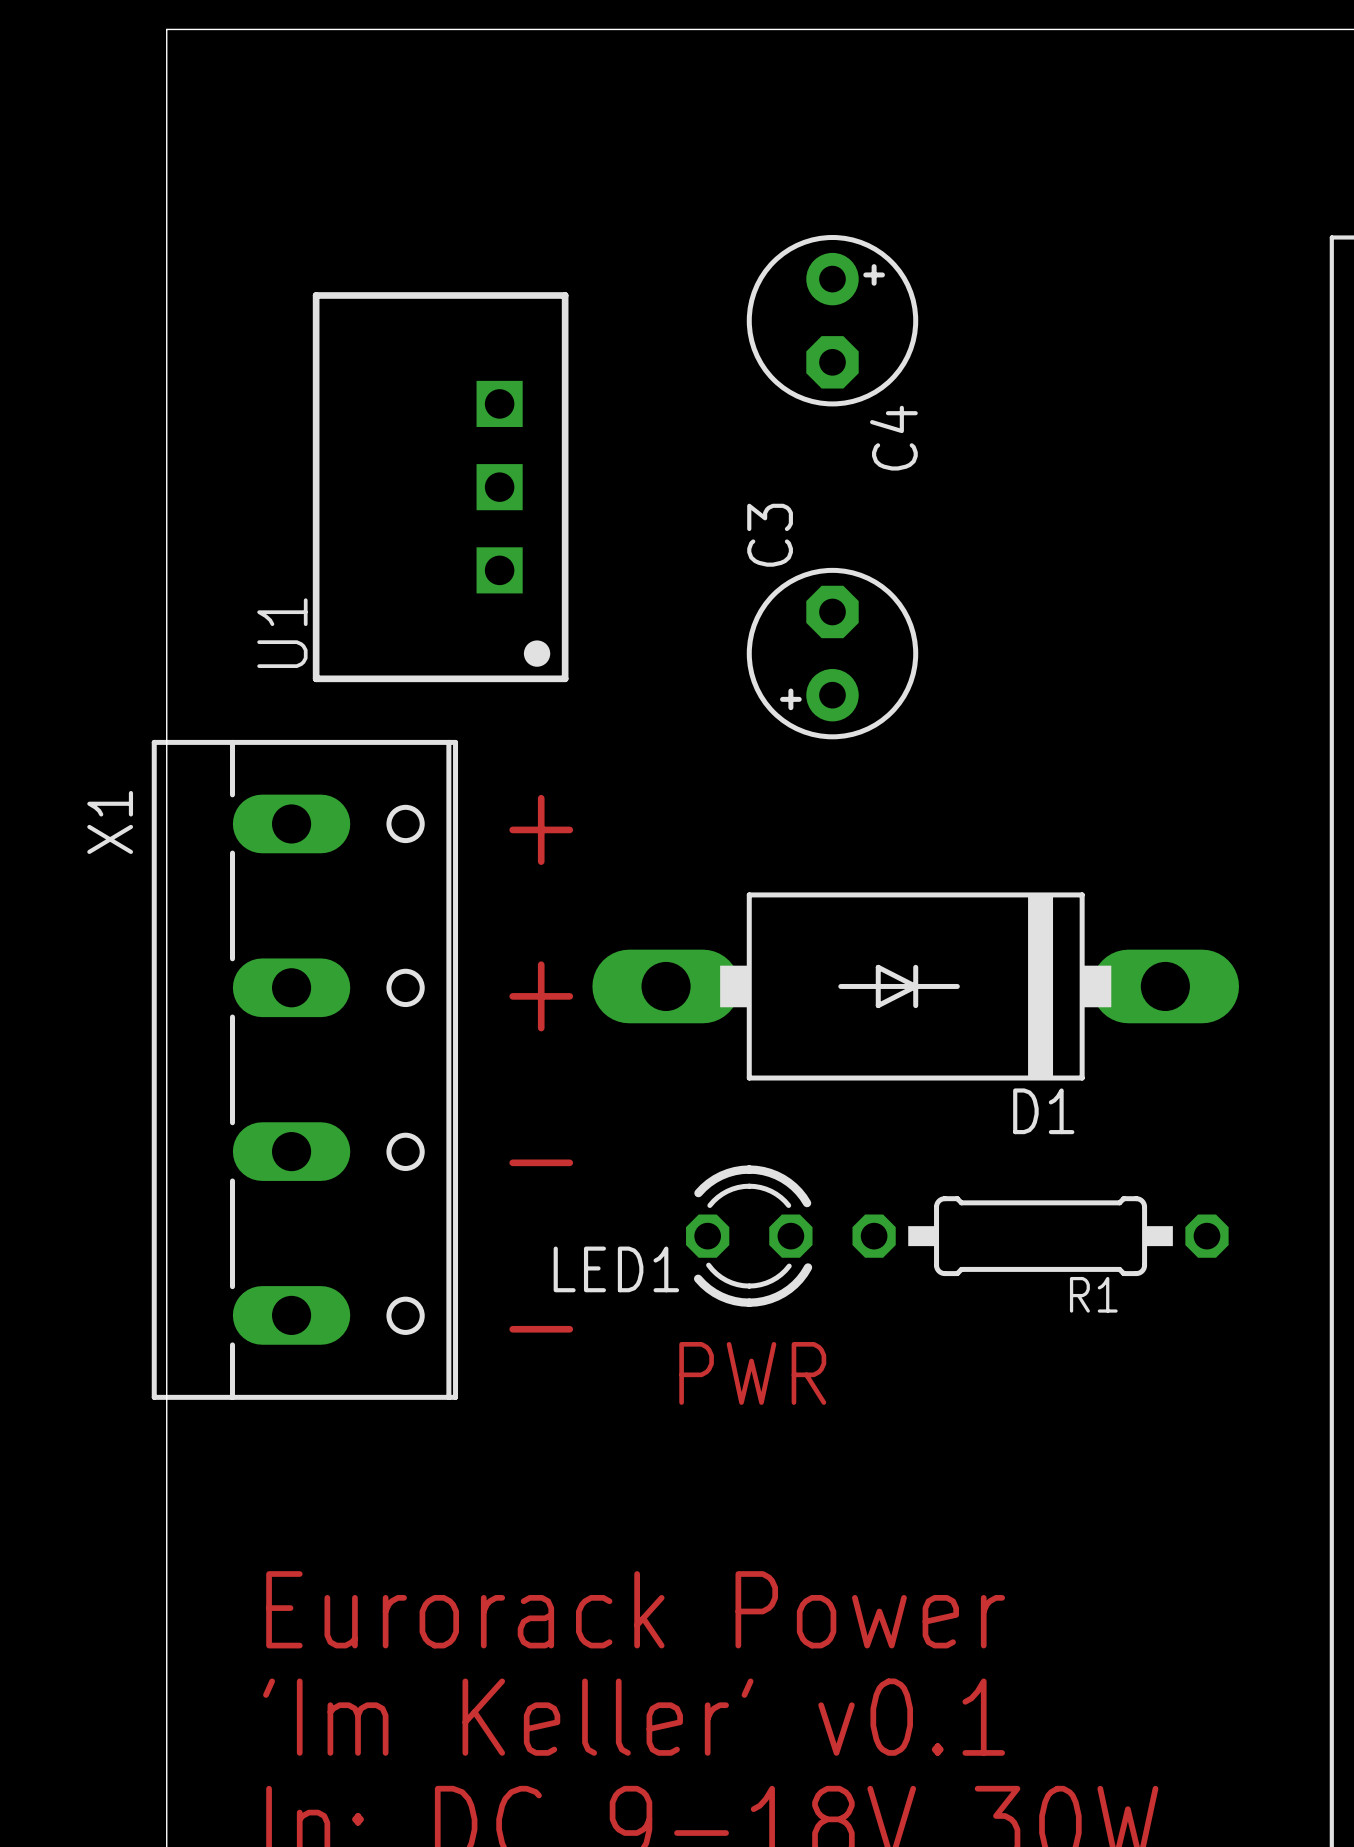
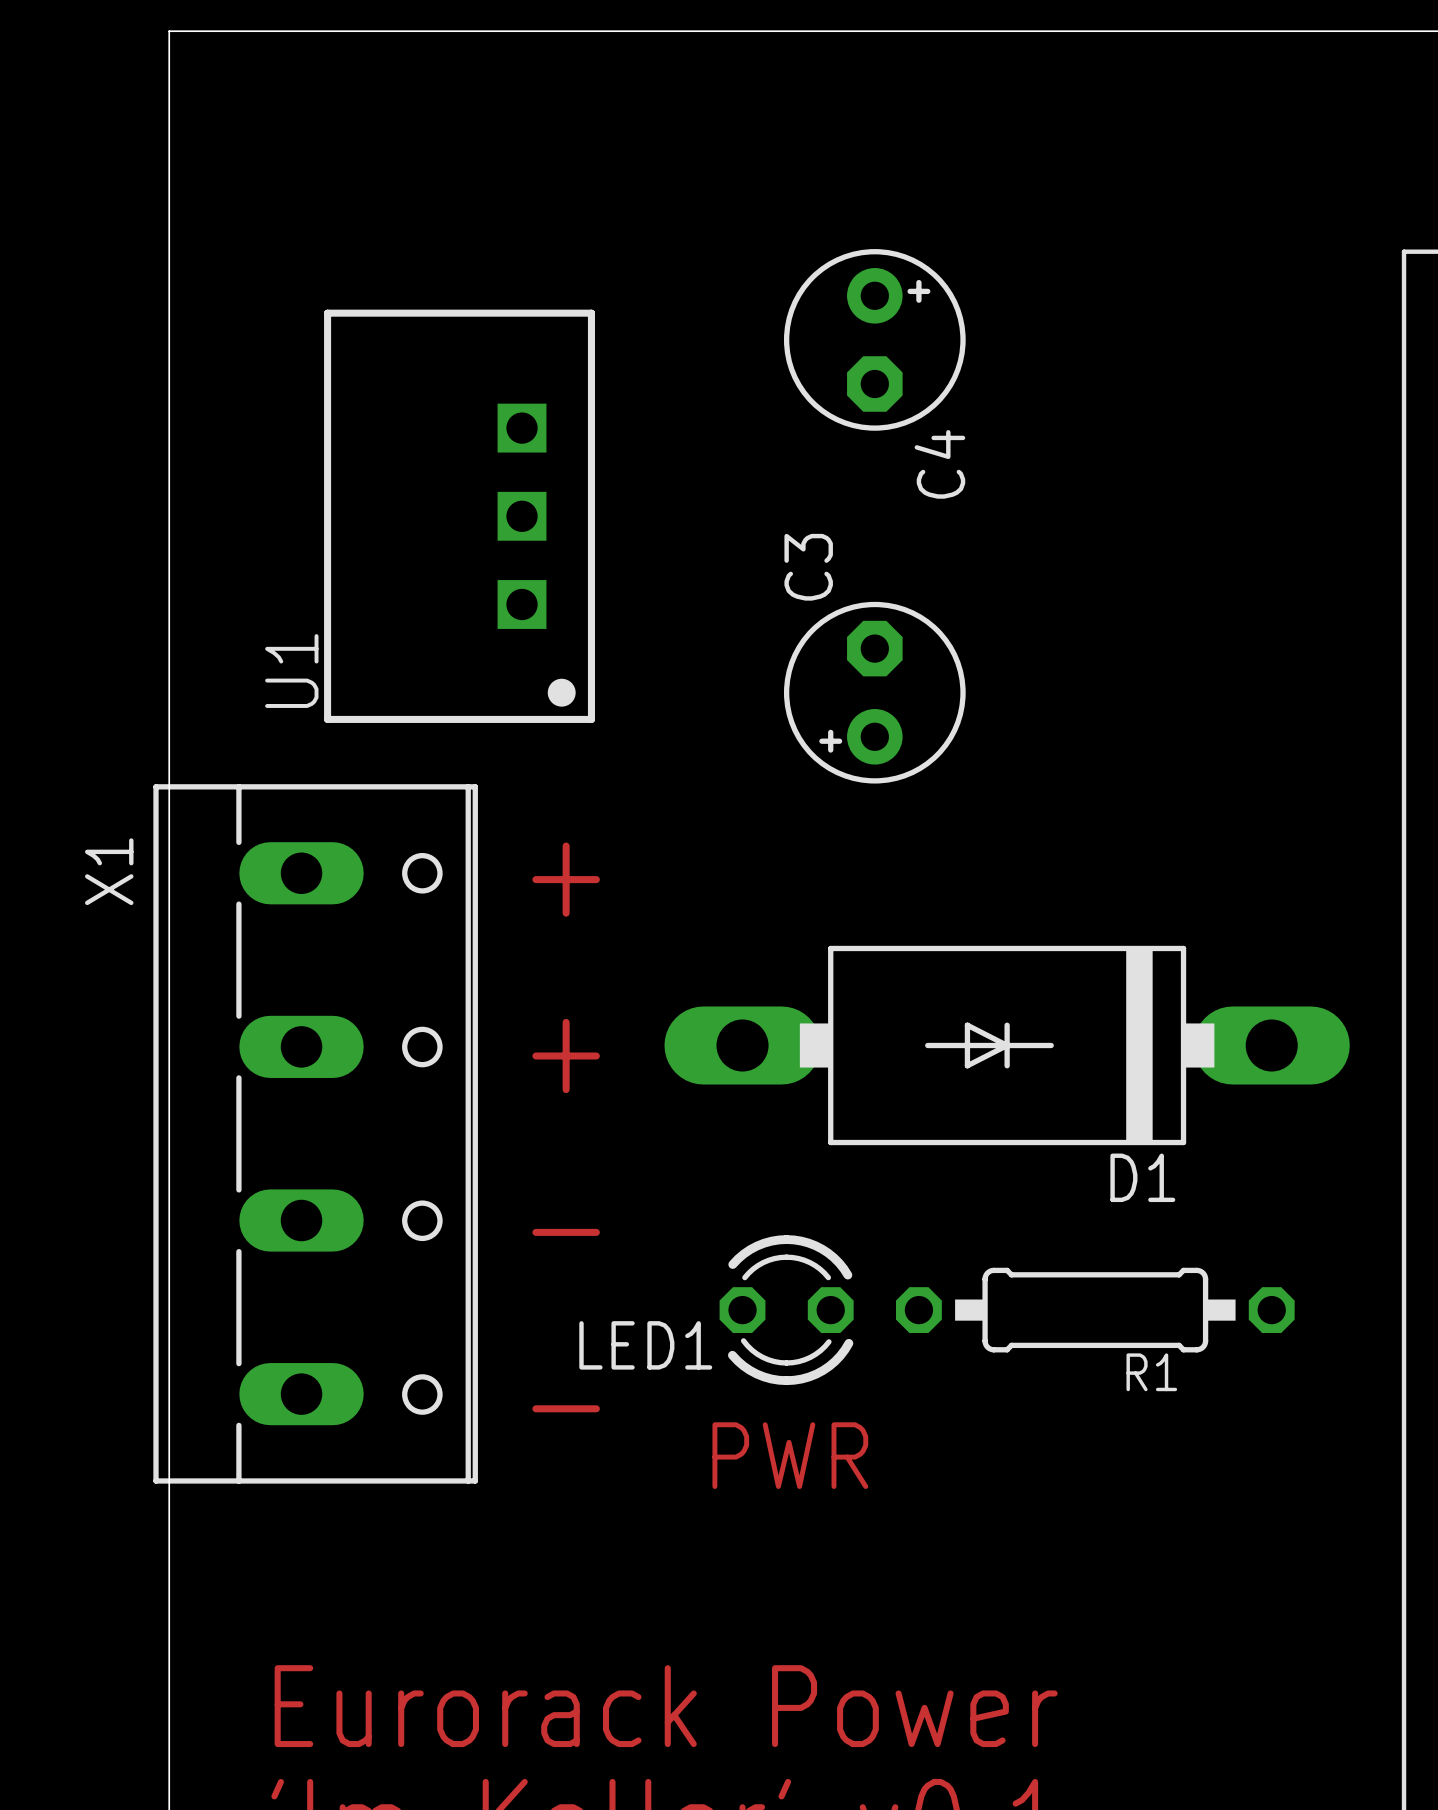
D1 position: (915, 986) -> (1007, 1045)

